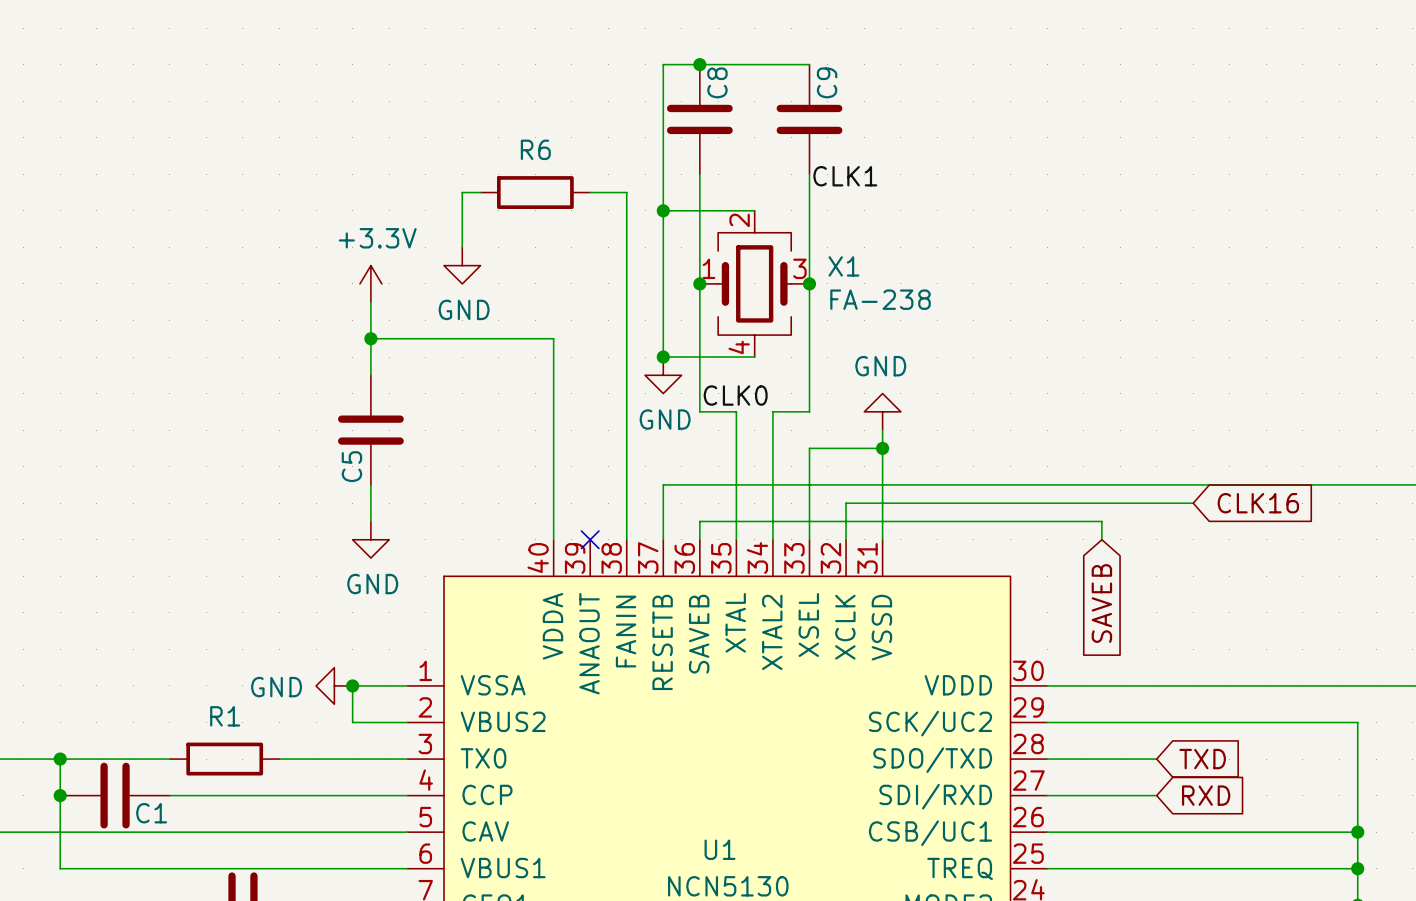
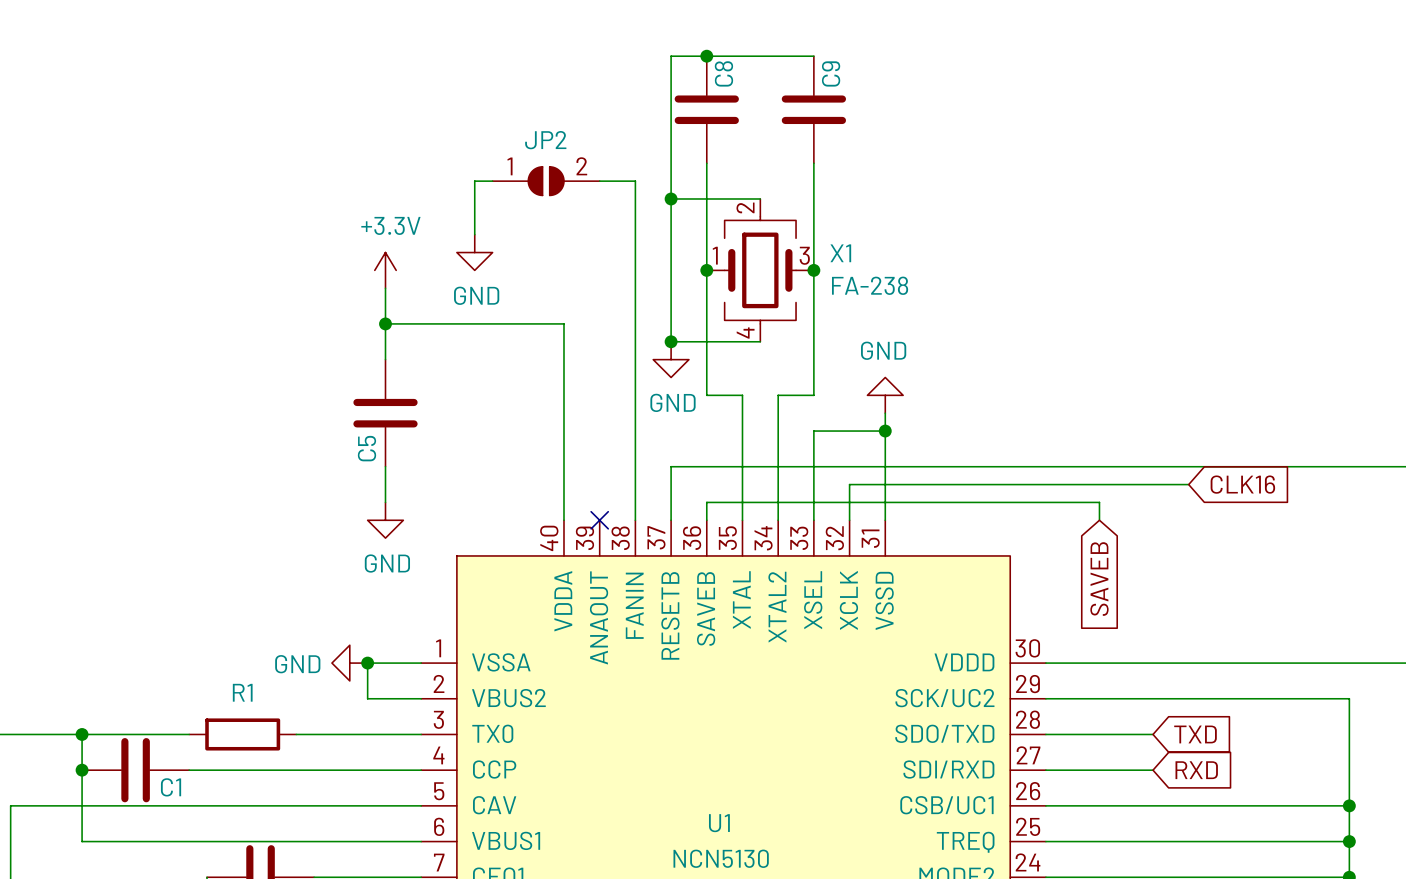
label: CLK1 (845, 176) -> none
R6: (535, 192) -> none
JP2: none -> (546, 181)
label: CLK0 (735, 395) -> none

